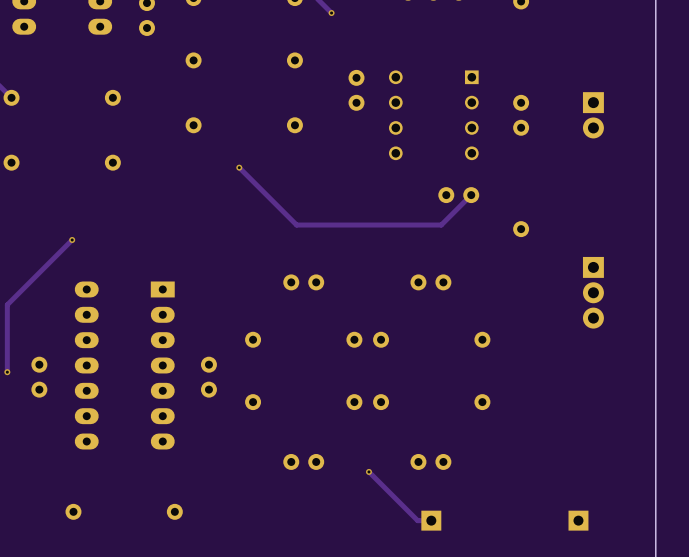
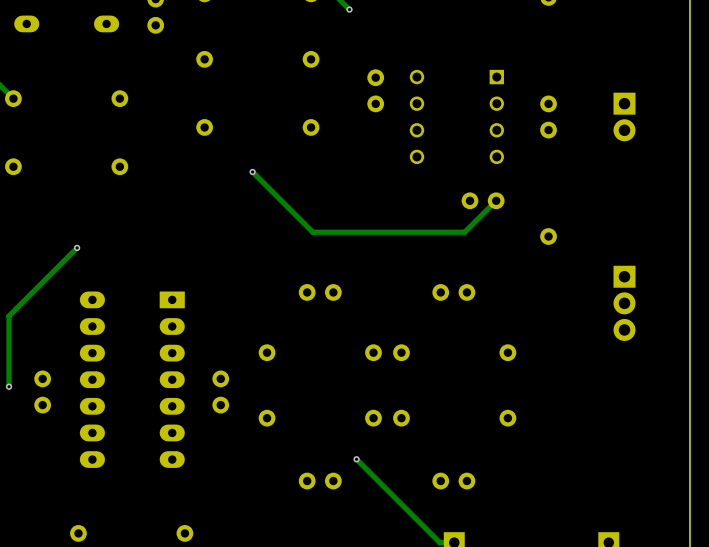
track: none -> (356, 459) (388, 491)
via position: (368, 471) -> (356, 459)

